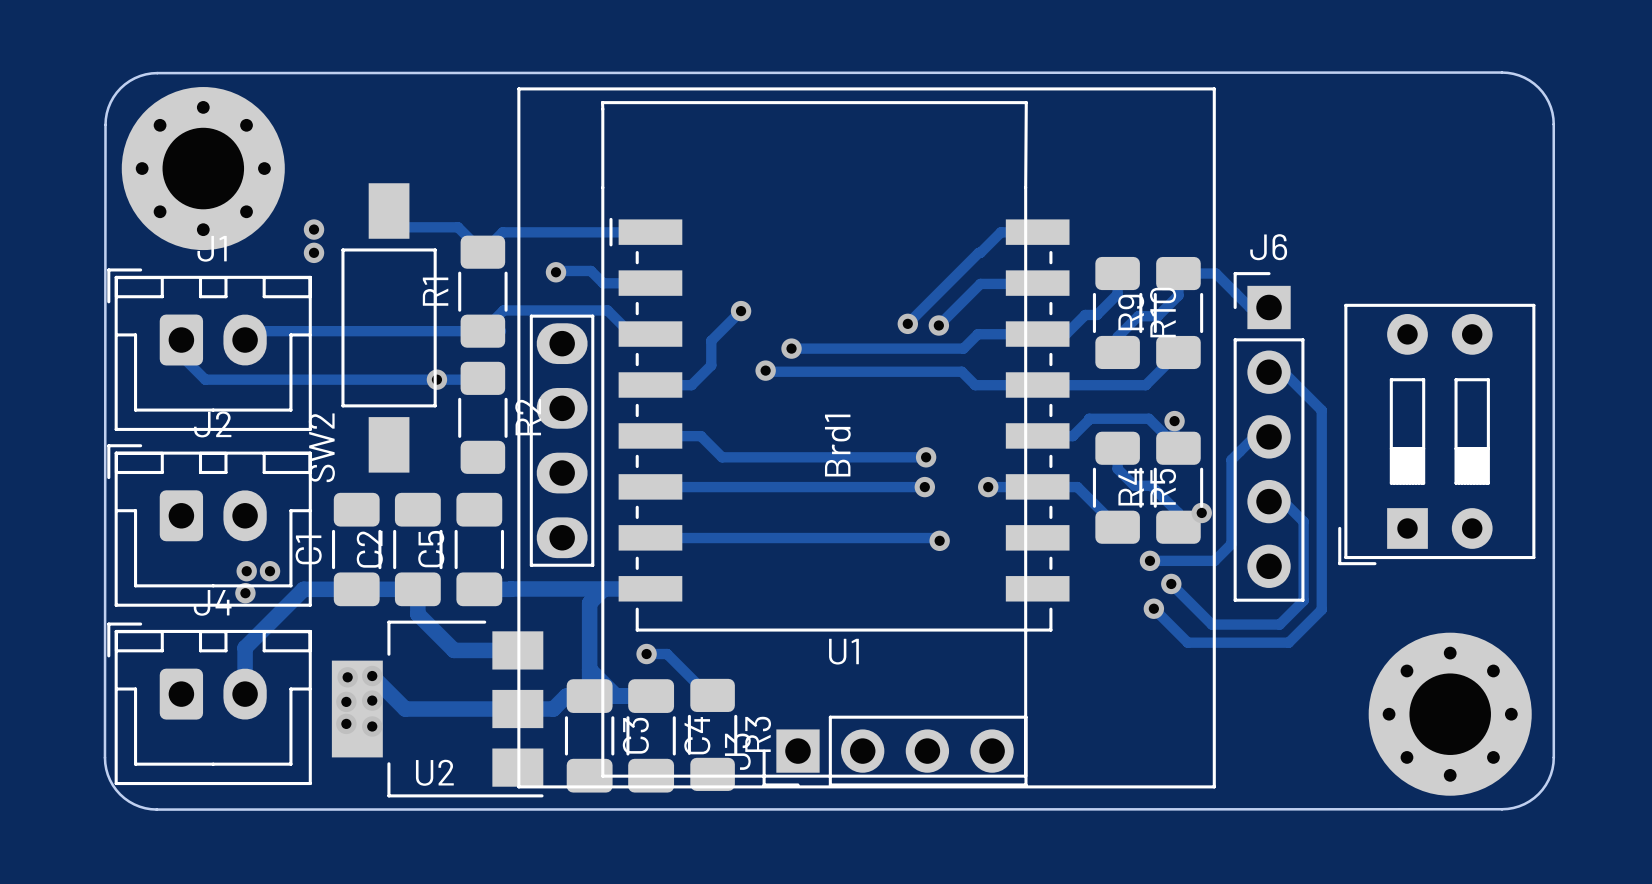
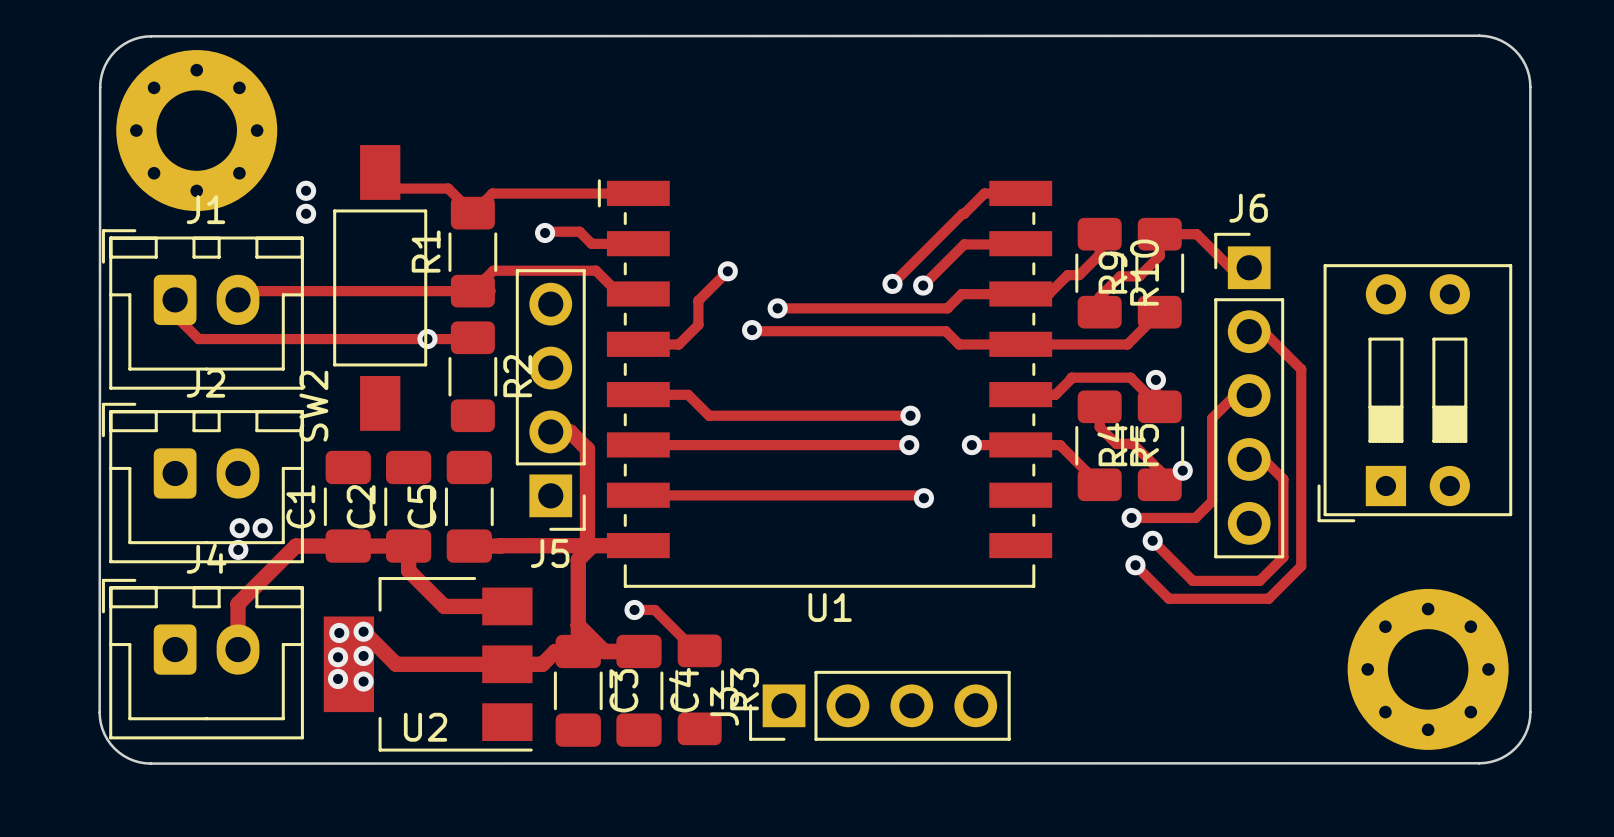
Brd1: (866, 437) -> none
J5: none -> (550, 399)
track: none -> (550, 431) (570, 431) (587, 449) (586, 545)

